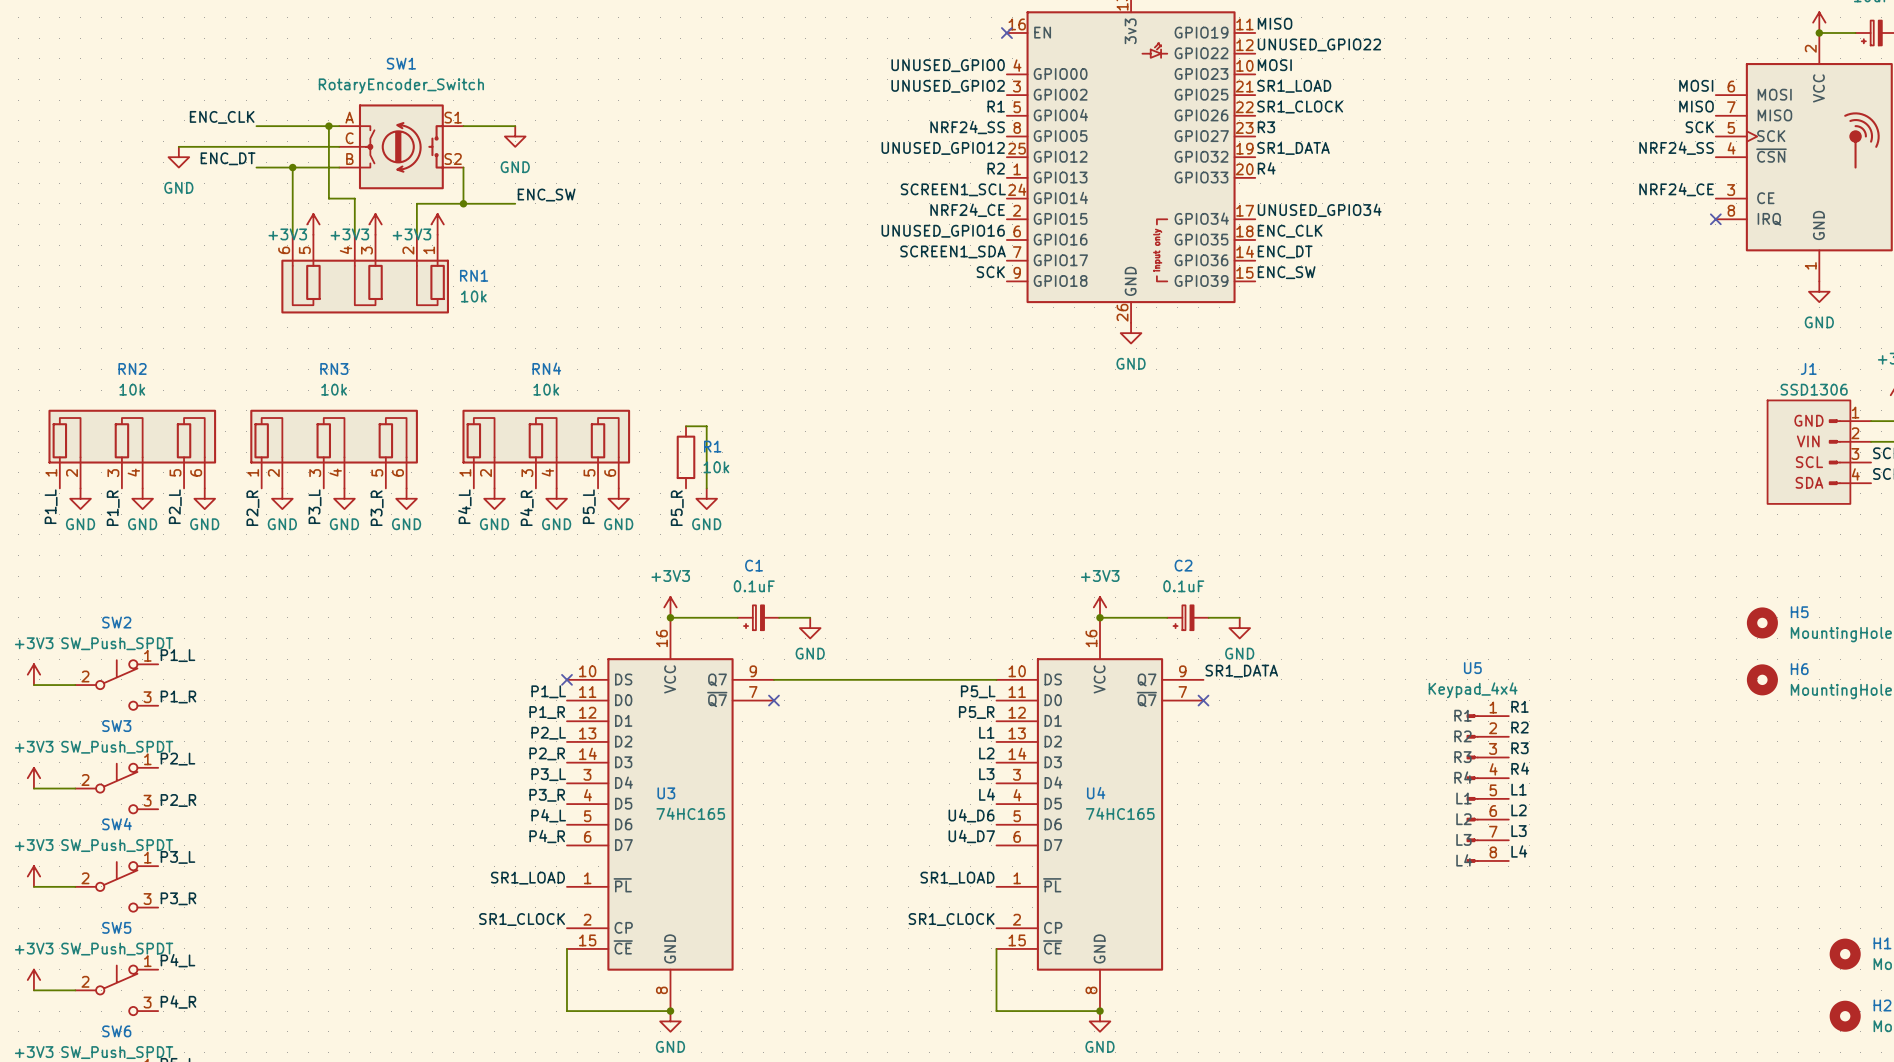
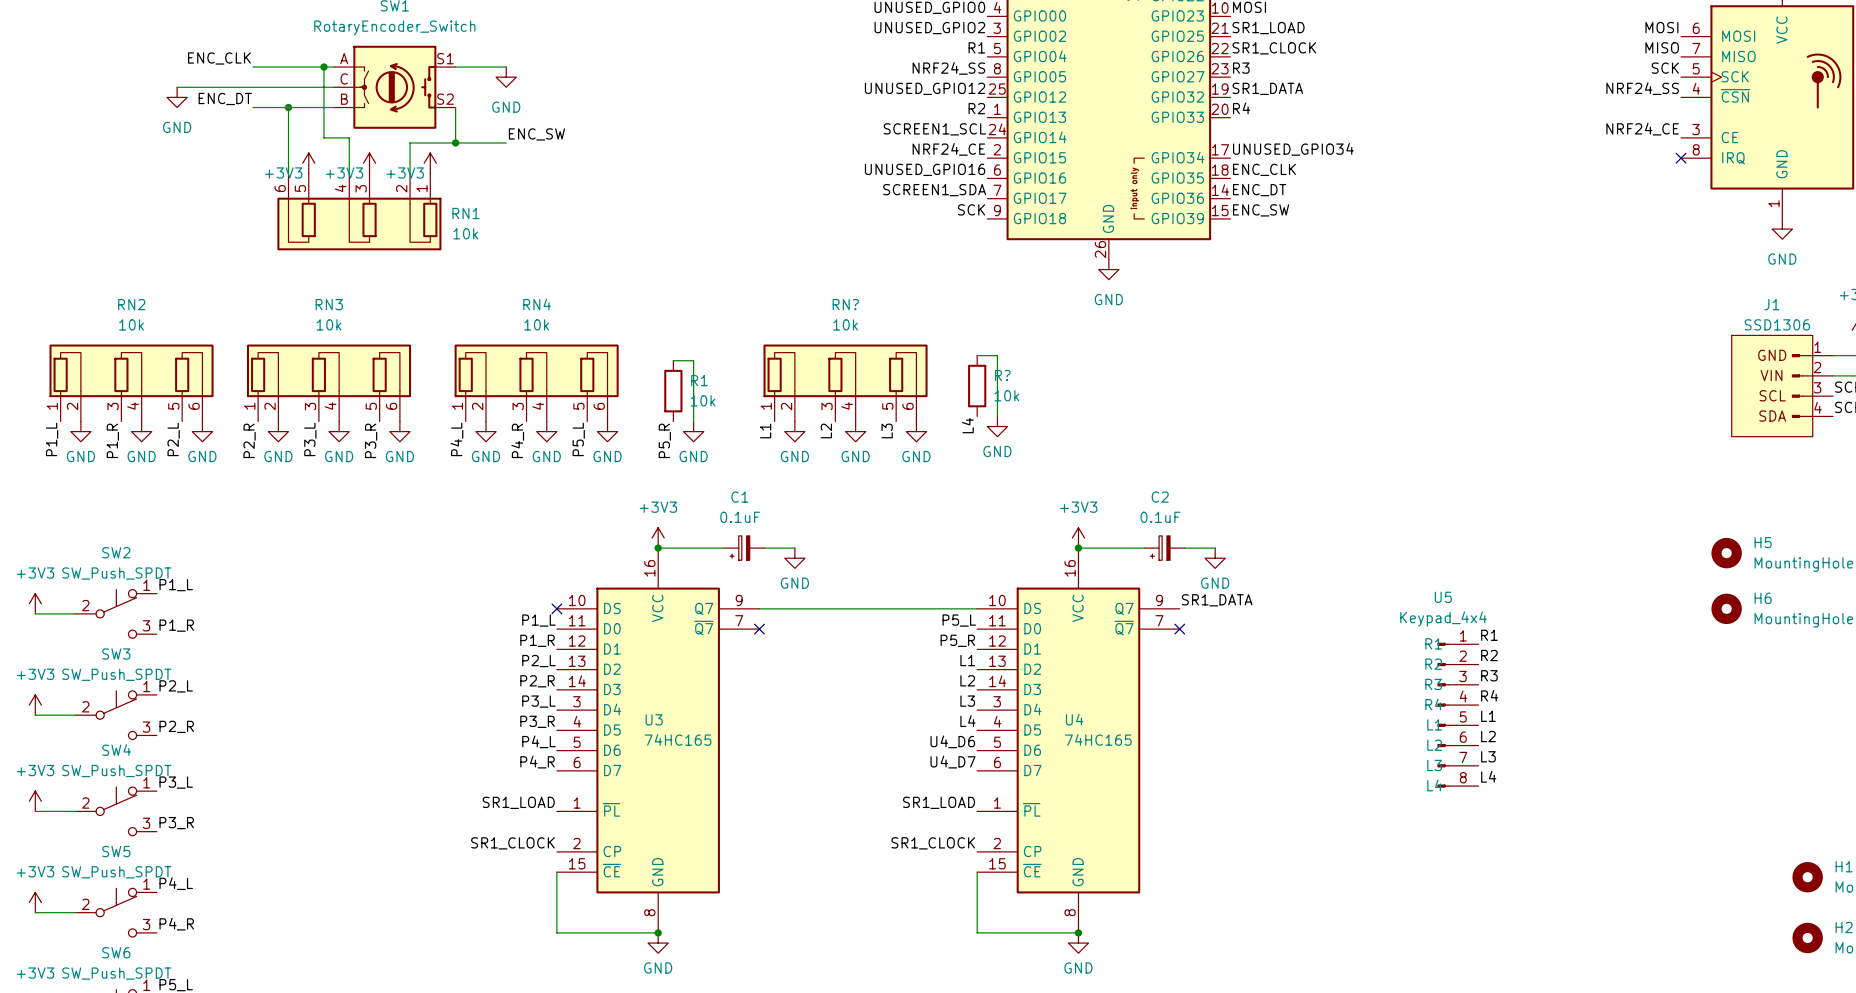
wire: none -> (977, 355) (997, 355) (997, 416)
RN?: none -> 10k (845, 383)
R?: none -> 10k (977, 386)
label: none -> L4 (967, 425)
power symbol: none -> GND (997, 426)
label: none -> L1 (765, 430)
power symbol: none -> GND (794, 431)
label: none -> L2 (826, 430)
power symbol: none -> GND (855, 431)
label: none -> L3 (887, 430)
power symbol: none -> GND (916, 431)

